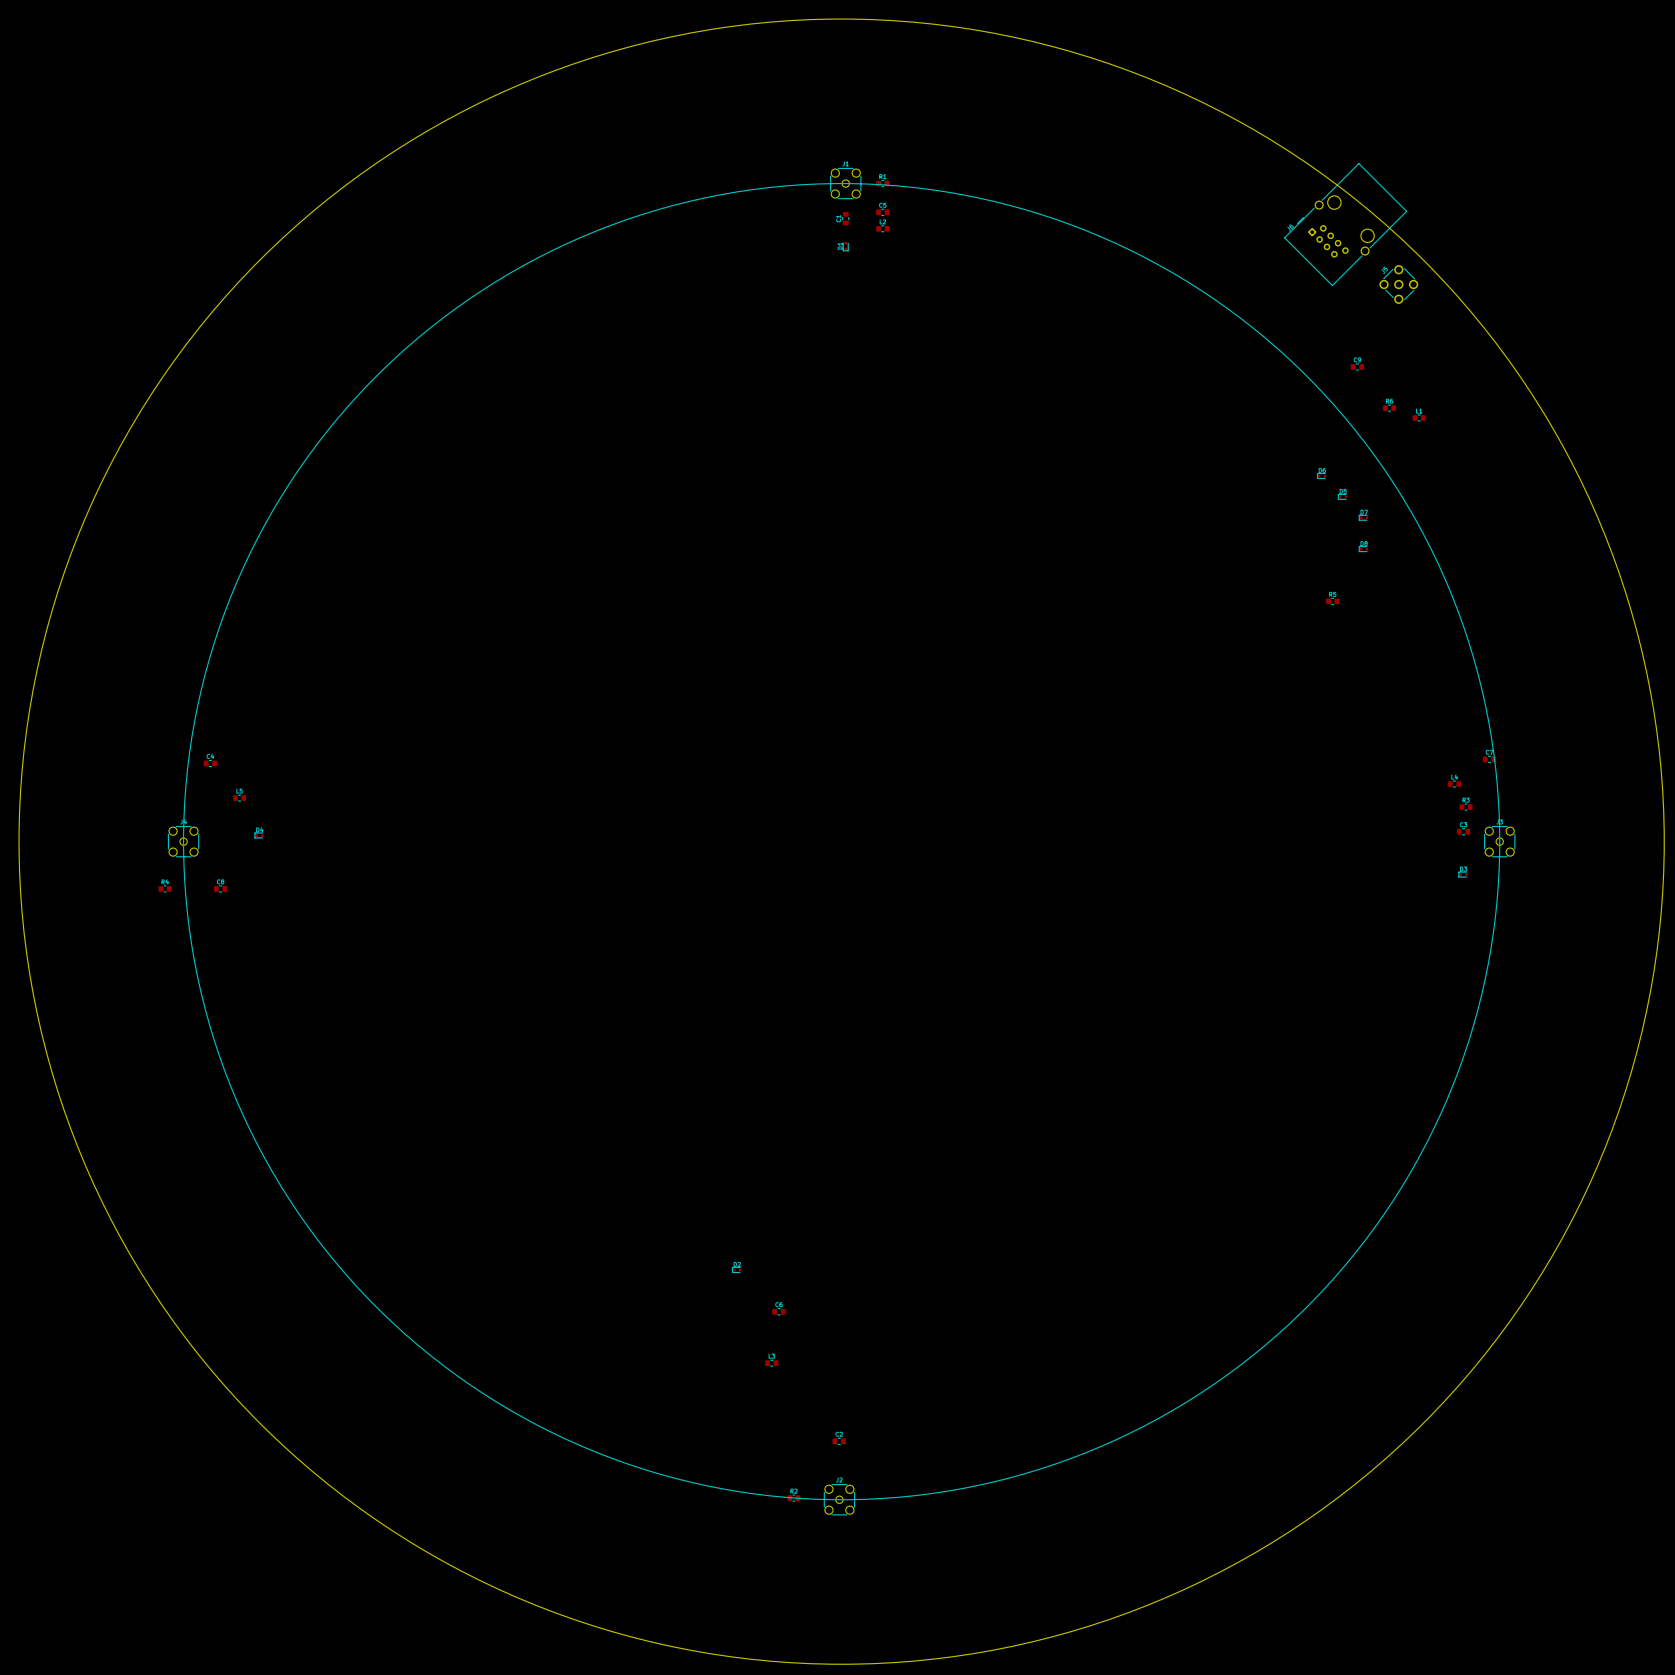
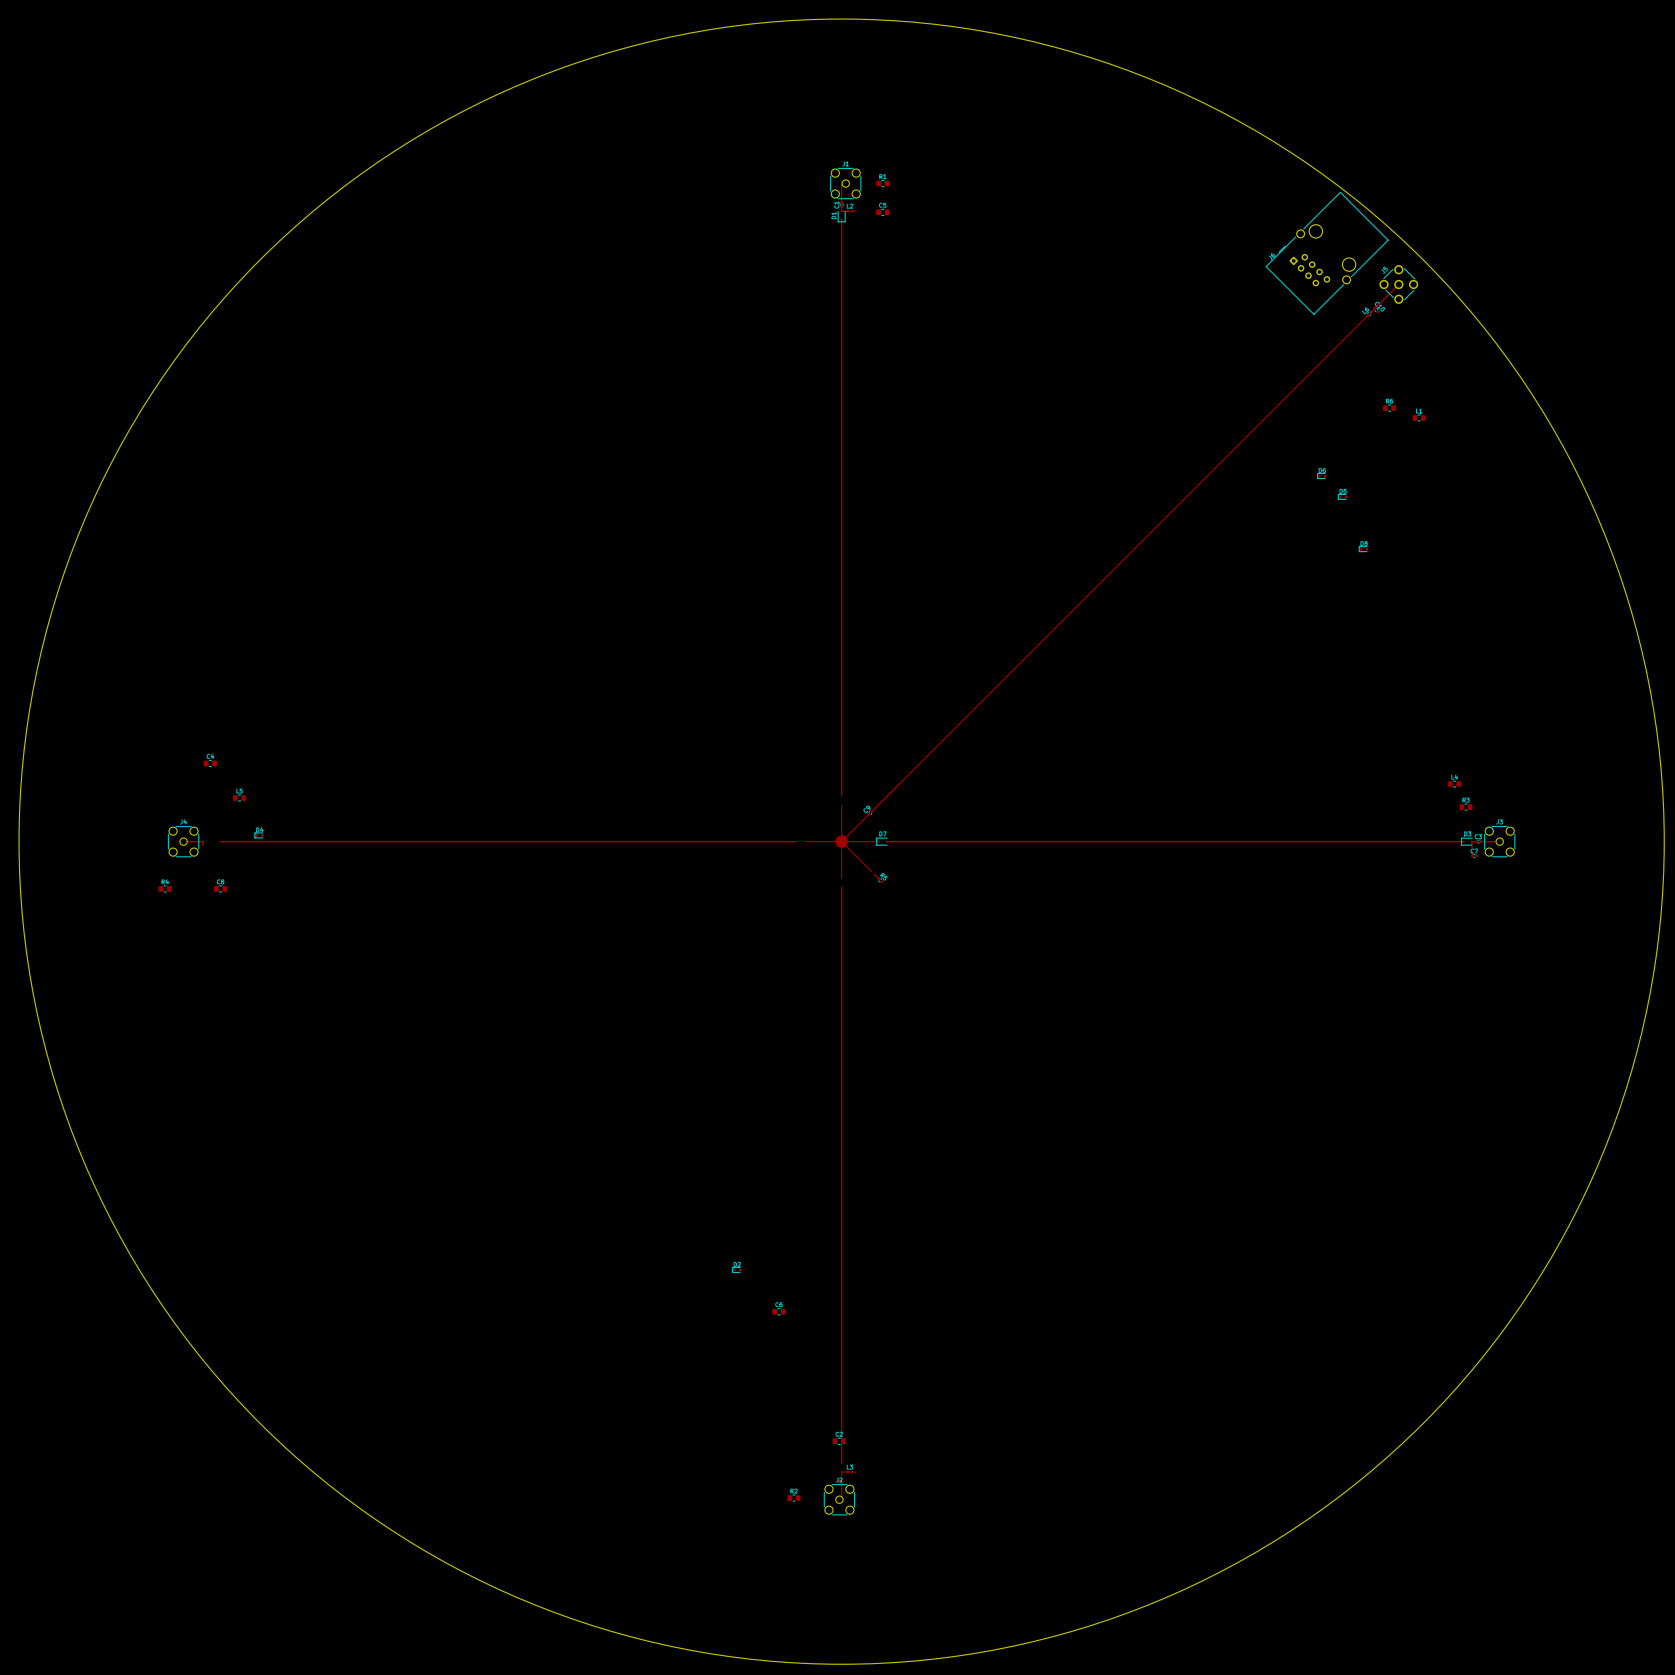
drawing shape: [183, 183, 1501, 1501] -> [835, 835, 848, 848]
track: none -> (841, 183) (841, 202)
track: none -> (837, 203) (841, 203)
track: none -> (841, 206) (841, 211) (847, 211)
part footprint: [842, 211, 850, 226] -> [839, 201, 844, 209]
track: none -> (851, 211) (855, 211)
track: none -> (841, 219) (841, 796)
part position: (1345, 224) -> (1327, 253)
part footprint: [876, 225, 890, 232] -> [846, 209, 854, 213]
part footprint: [843, 241, 849, 252] -> [837, 210, 846, 223]
track: none -> (1398, 284) (1380, 302)
track: none -> (1380, 302) (1374, 308)
track: none -> (1374, 308) (1370, 312)
part: none -> (1376, 310)
part: none -> (1369, 314)
track: none -> (1367, 315) (871, 811)
part footprint: [1350, 363, 1365, 371] -> [867, 809, 874, 816]
part footprint: [1359, 515, 1369, 521] -> [876, 837, 889, 846]
part footprint: [1326, 598, 1340, 605] -> [877, 877, 884, 884]
part footprint: [1482, 756, 1497, 763] -> [1471, 854, 1478, 858]
track: none -> (841, 804) (841, 878)
track: none -> (869, 814) (841, 841) (871, 871)
part footprint: [1456, 828, 1471, 836] -> [1475, 839, 1482, 844]
track: none -> (1480, 837) (1480, 841) (1499, 841)
track: none -> (183, 841) (202, 841) (202, 845)
track: none -> (219, 841) (796, 841)
track: none -> (804, 841) (878, 841)
track: none -> (887, 841) (1463, 841)
track: none -> (1476, 841) (1471, 841) (1471, 847)
track: none -> (1472, 851) (1472, 855)
part footprint: [1458, 871, 1468, 878] -> [1461, 837, 1474, 846]
track: none -> (874, 874) (878, 878)
track: none -> (841, 887) (841, 1463)
part footprint: [765, 1360, 779, 1367] -> [846, 1470, 854, 1474]
track: none -> (847, 1471) (841, 1471) (841, 1476)
track: none -> (851, 1472) (855, 1472)
track: none -> (837, 1480) (841, 1480) (841, 1499)

